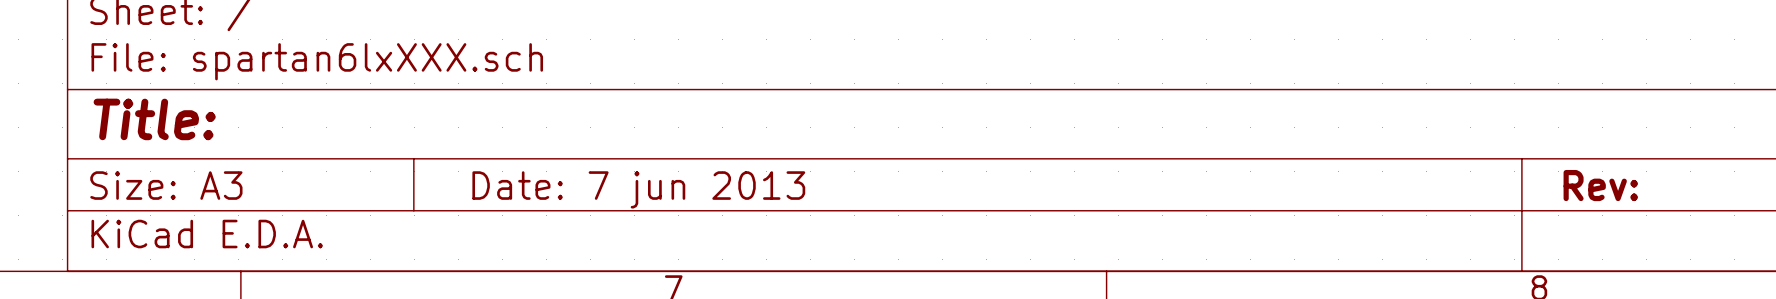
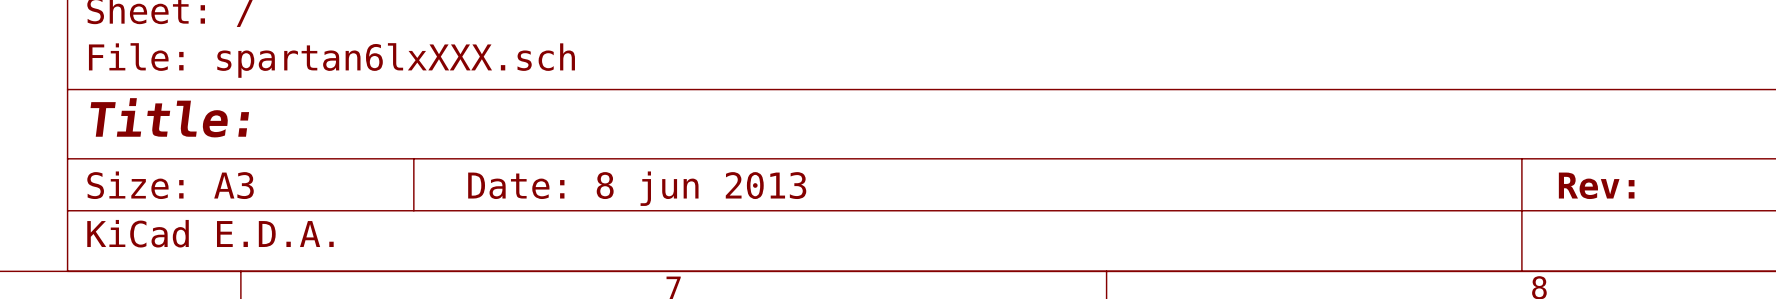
title block: Date: 7 jun 2013 (638, 189) -> Date: 8 jun 2013 (637, 188)

